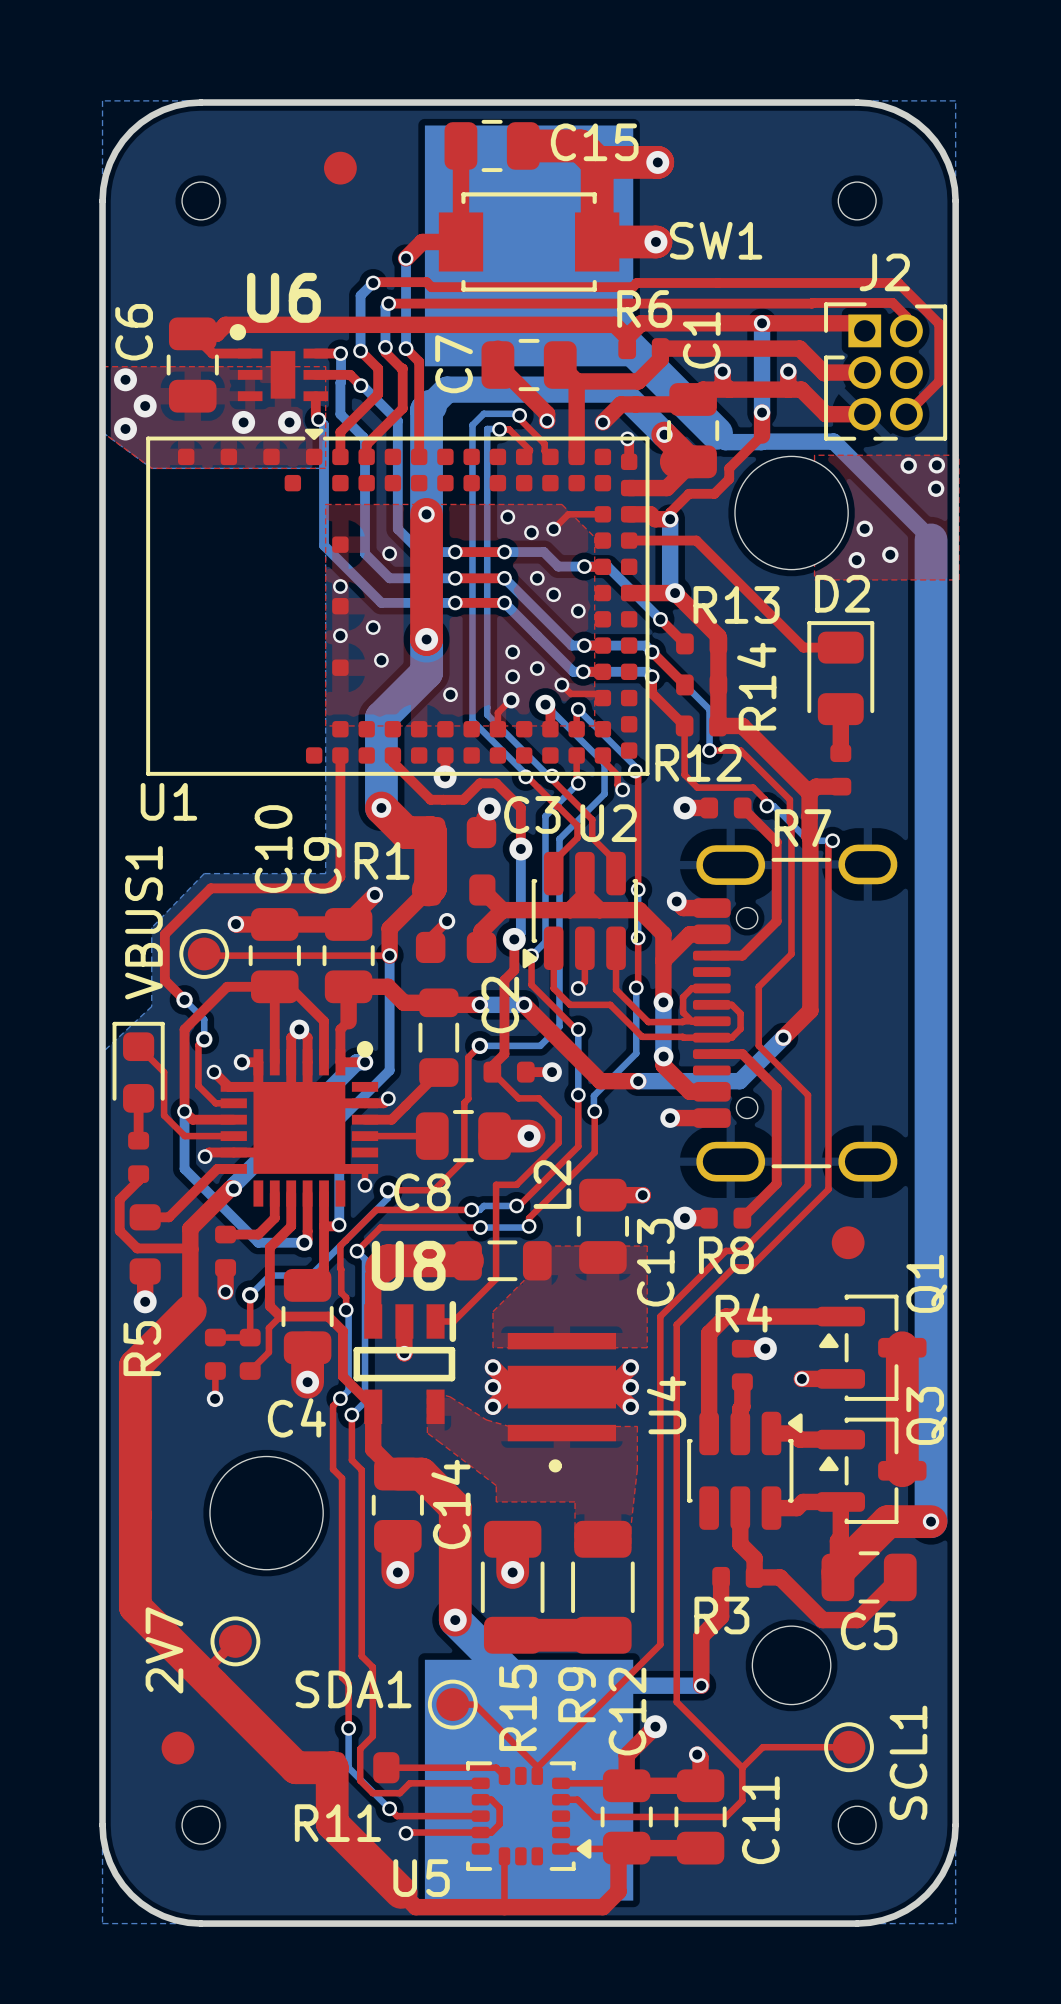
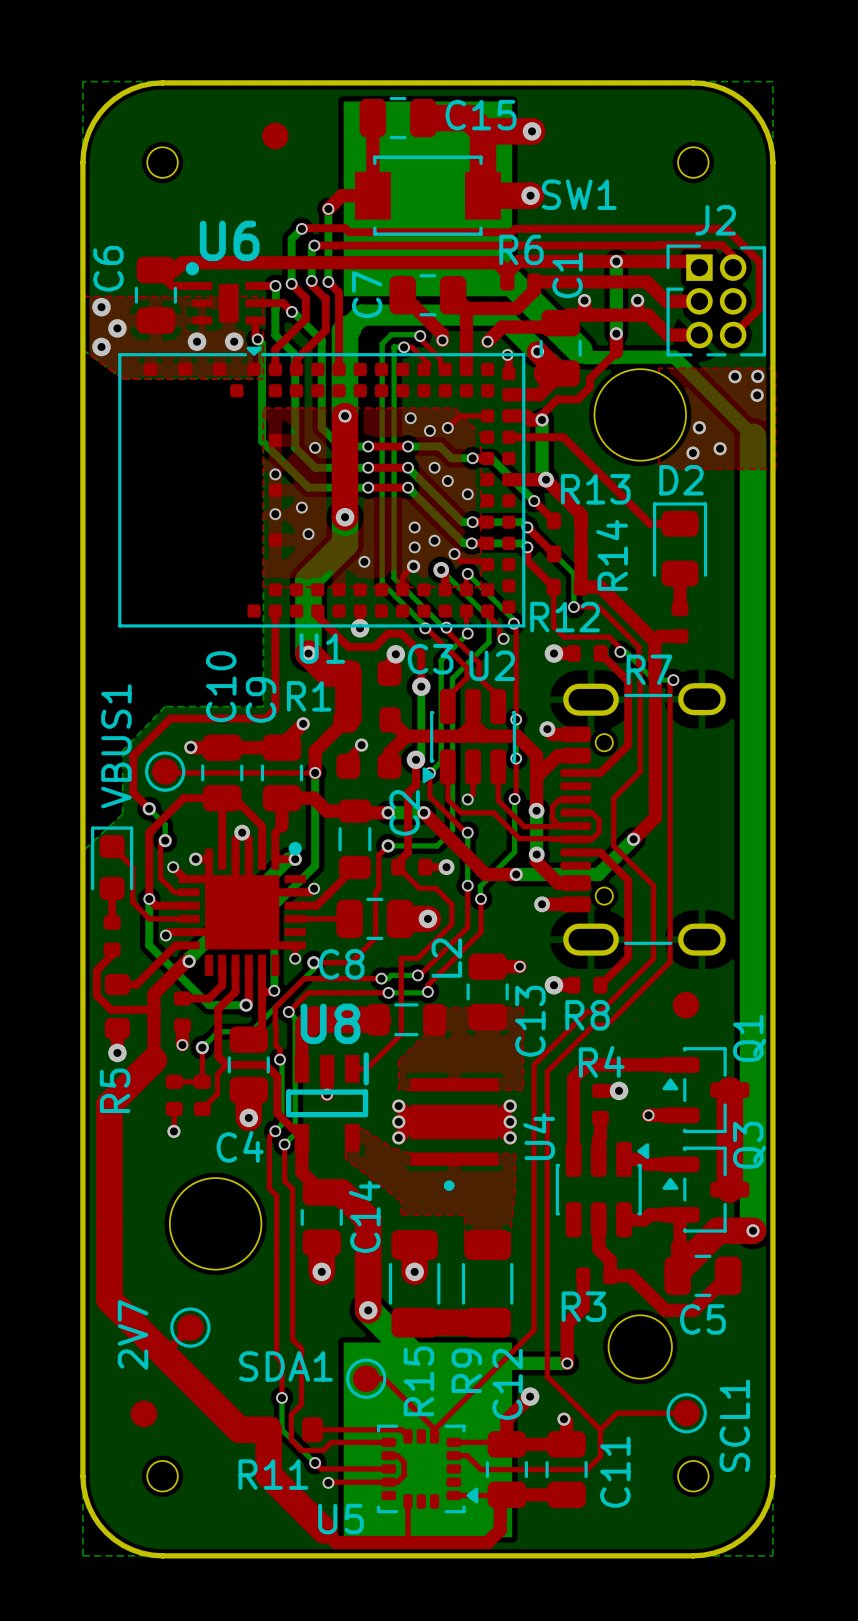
U1 name position: U1 (168, 801) -> U1 (322, 648)

